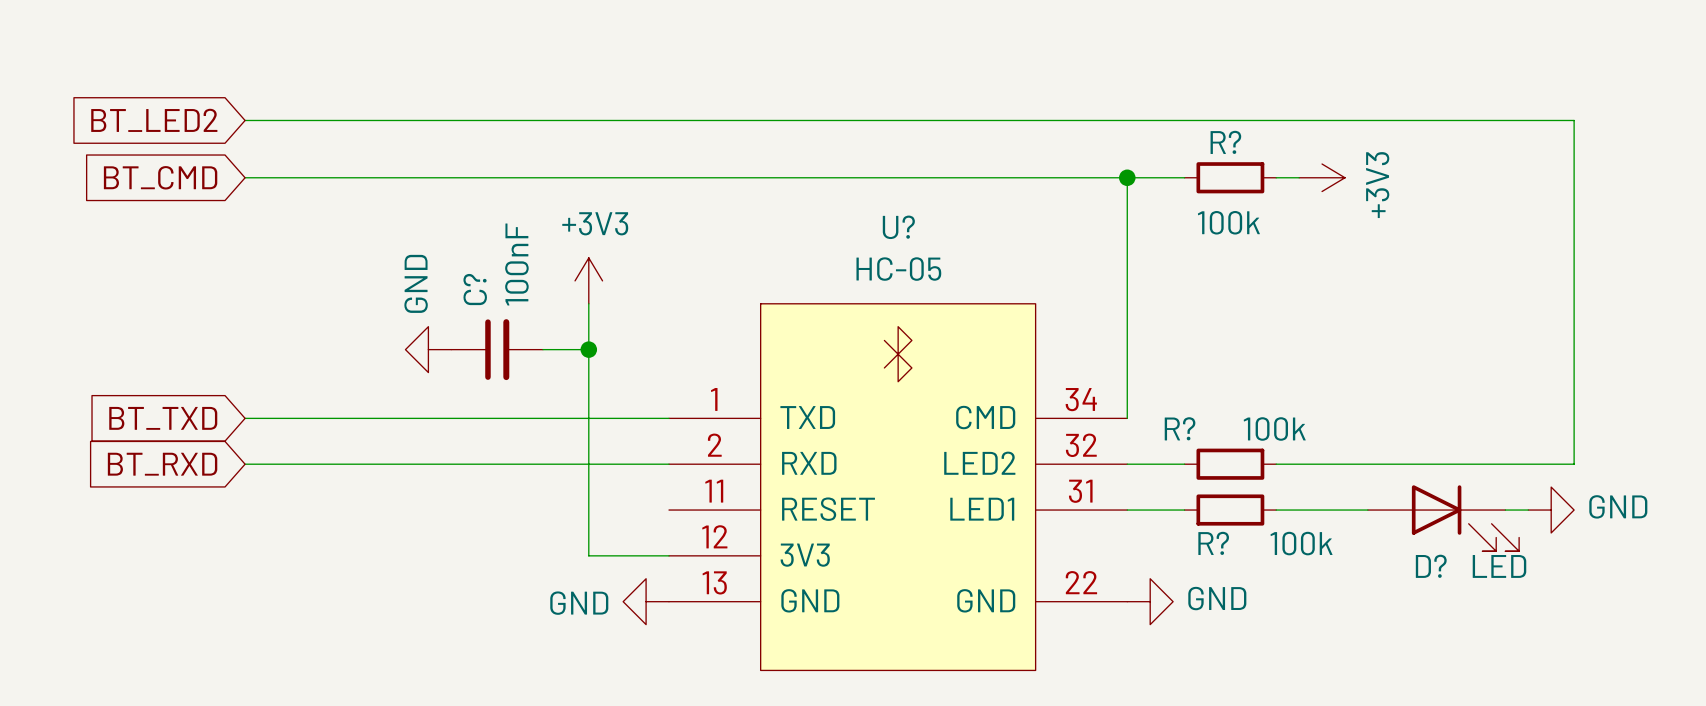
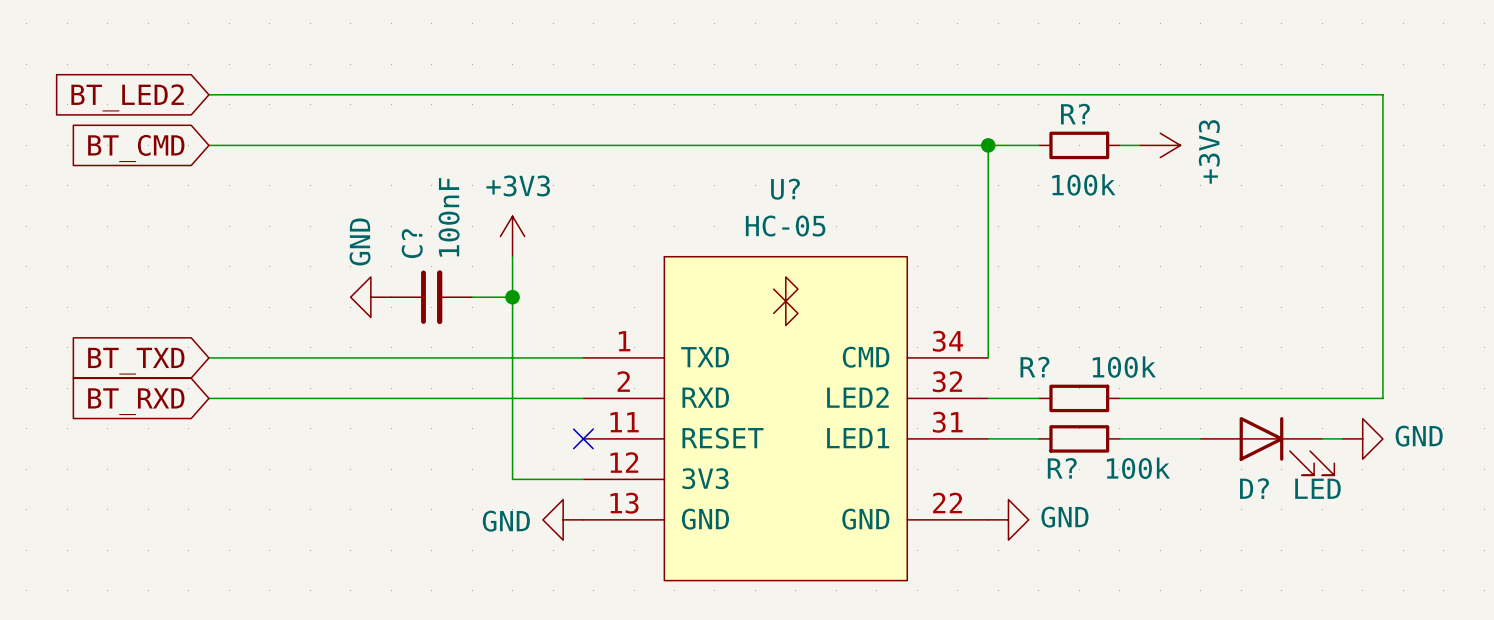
no-connect mark: none -> (583, 438)

